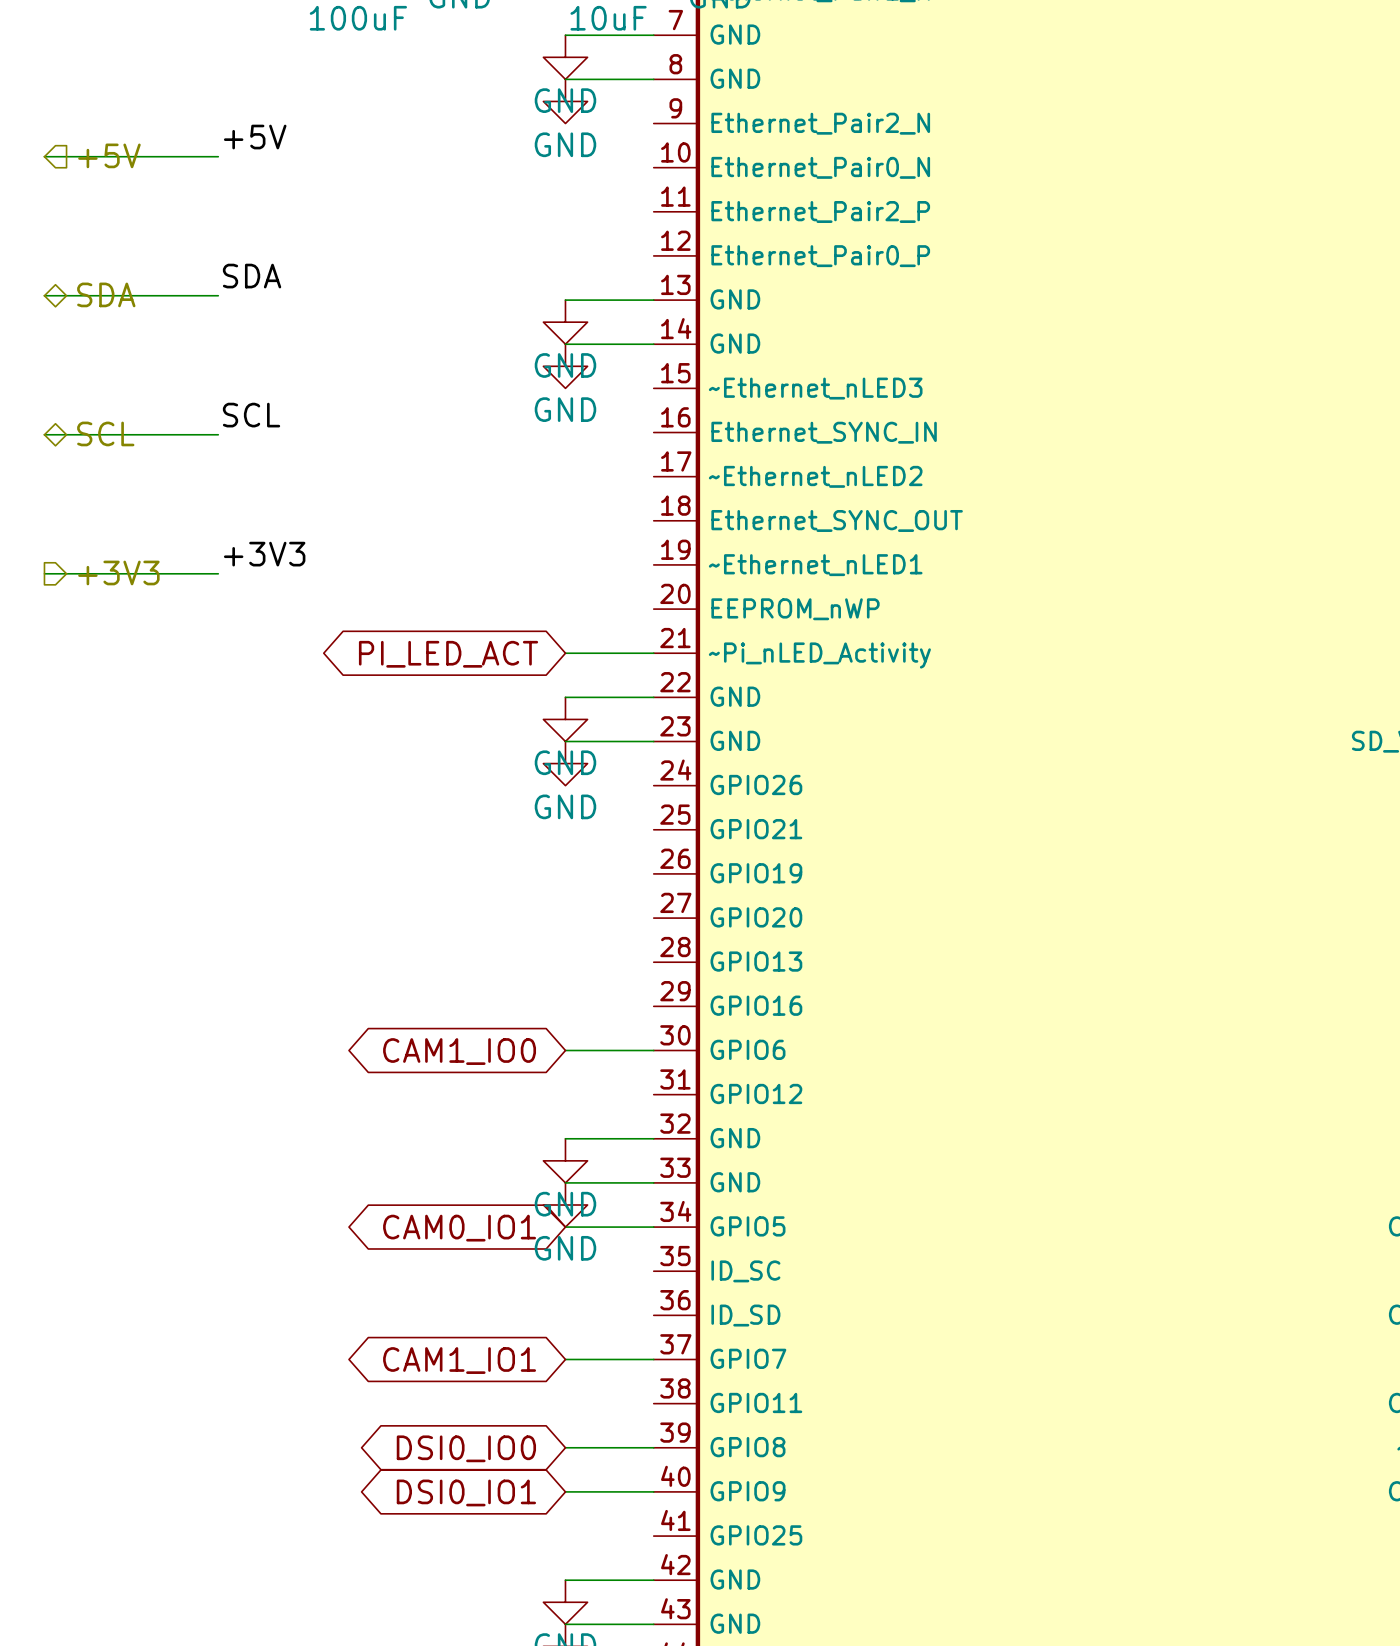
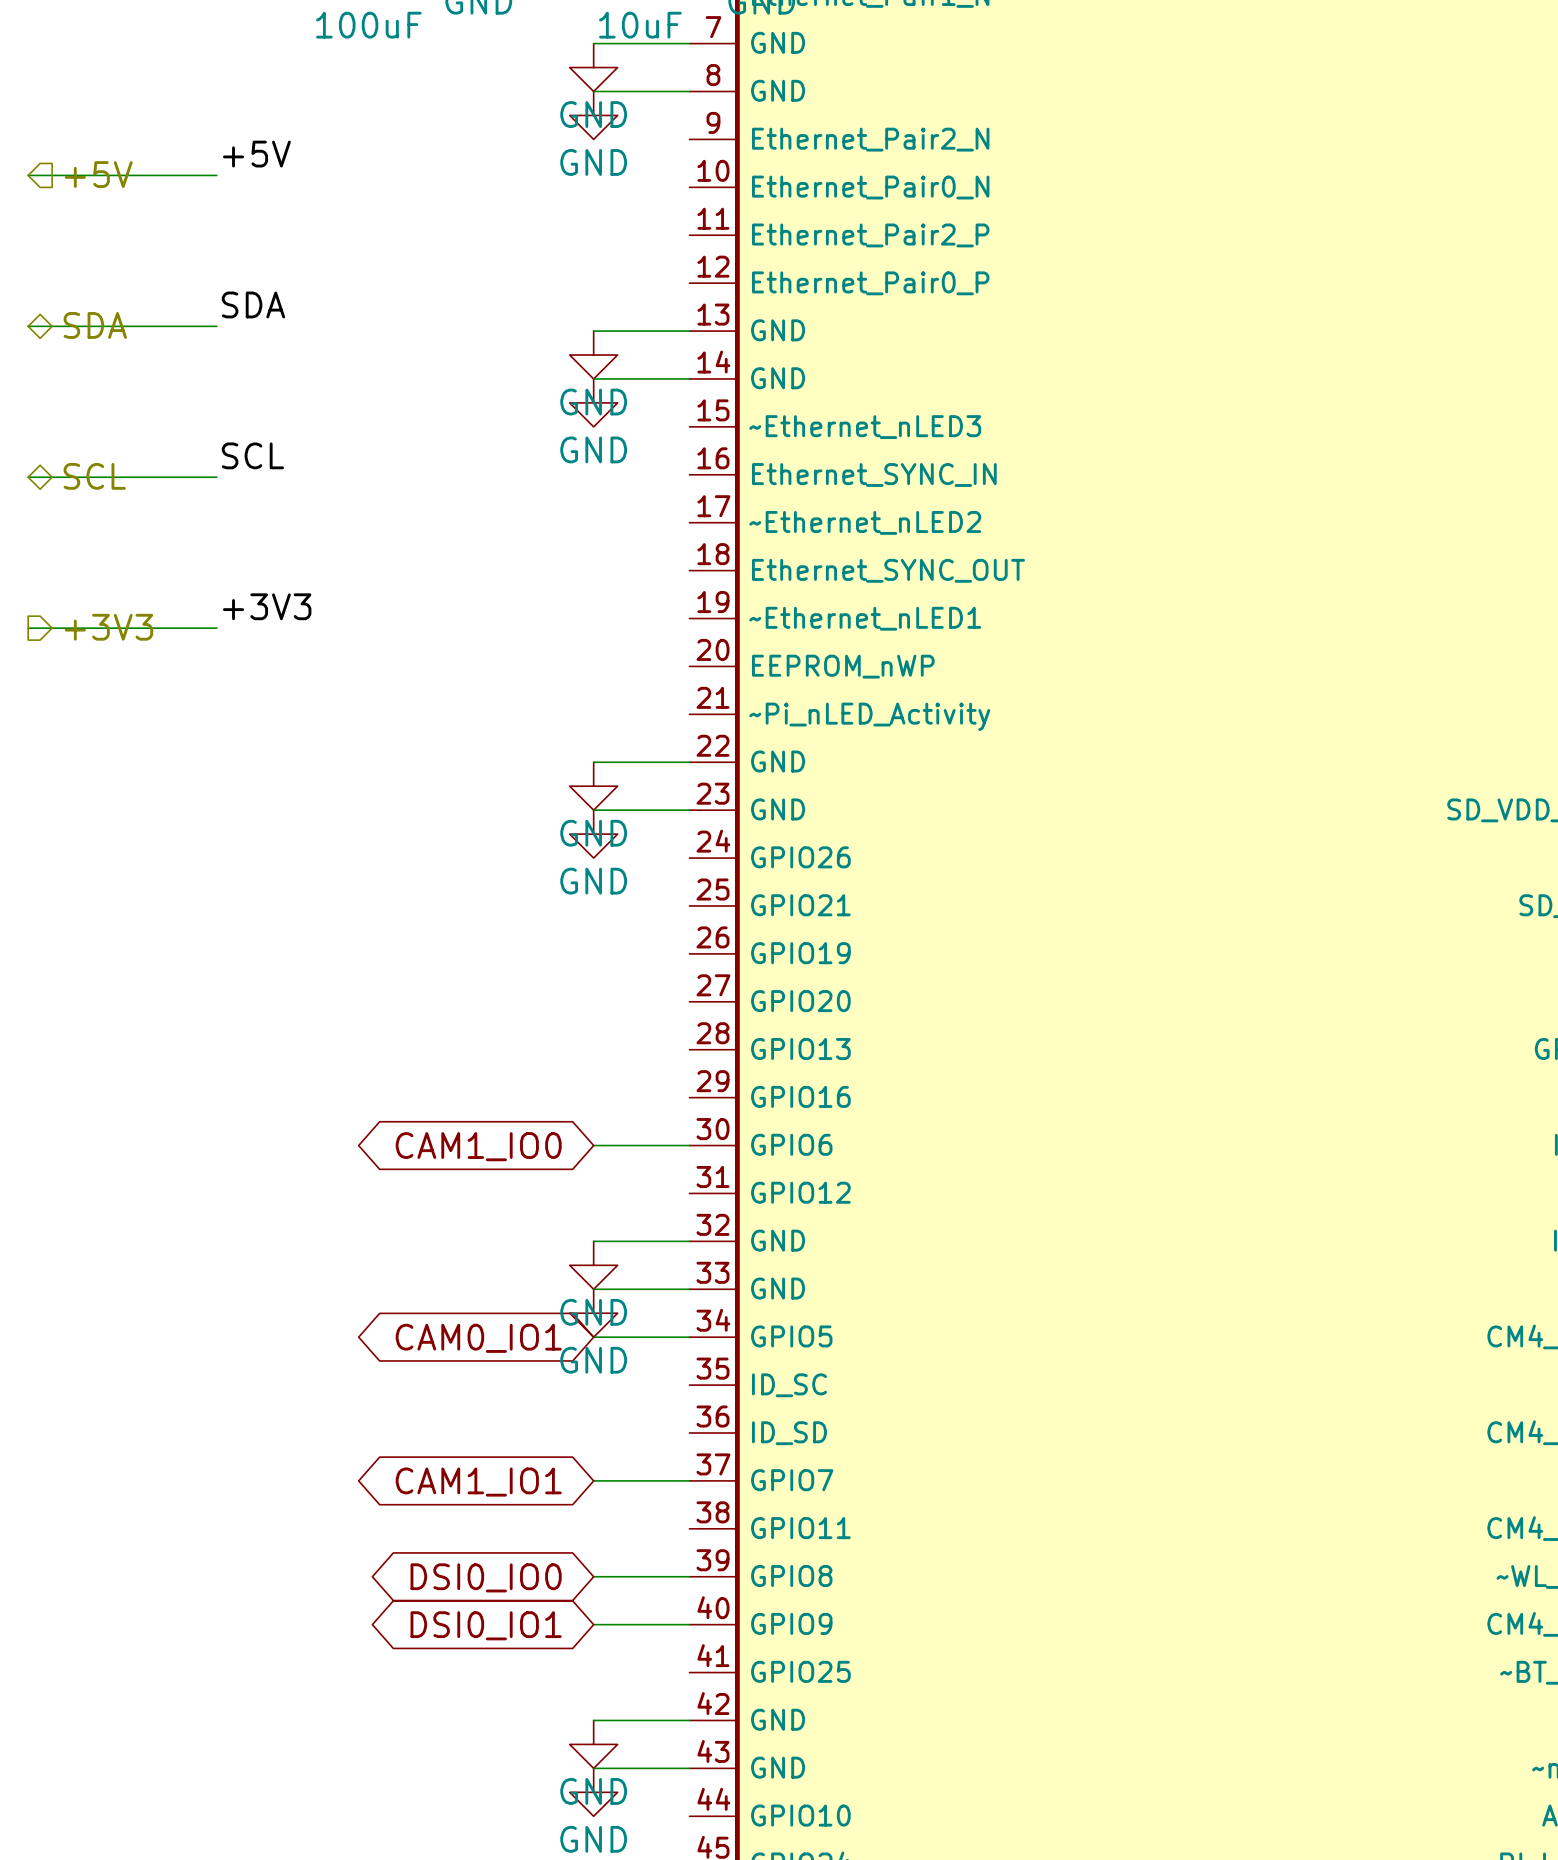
wire: (565, 653) (653, 653) -> none
global label: PI_LED_ACT (448, 654) -> none

